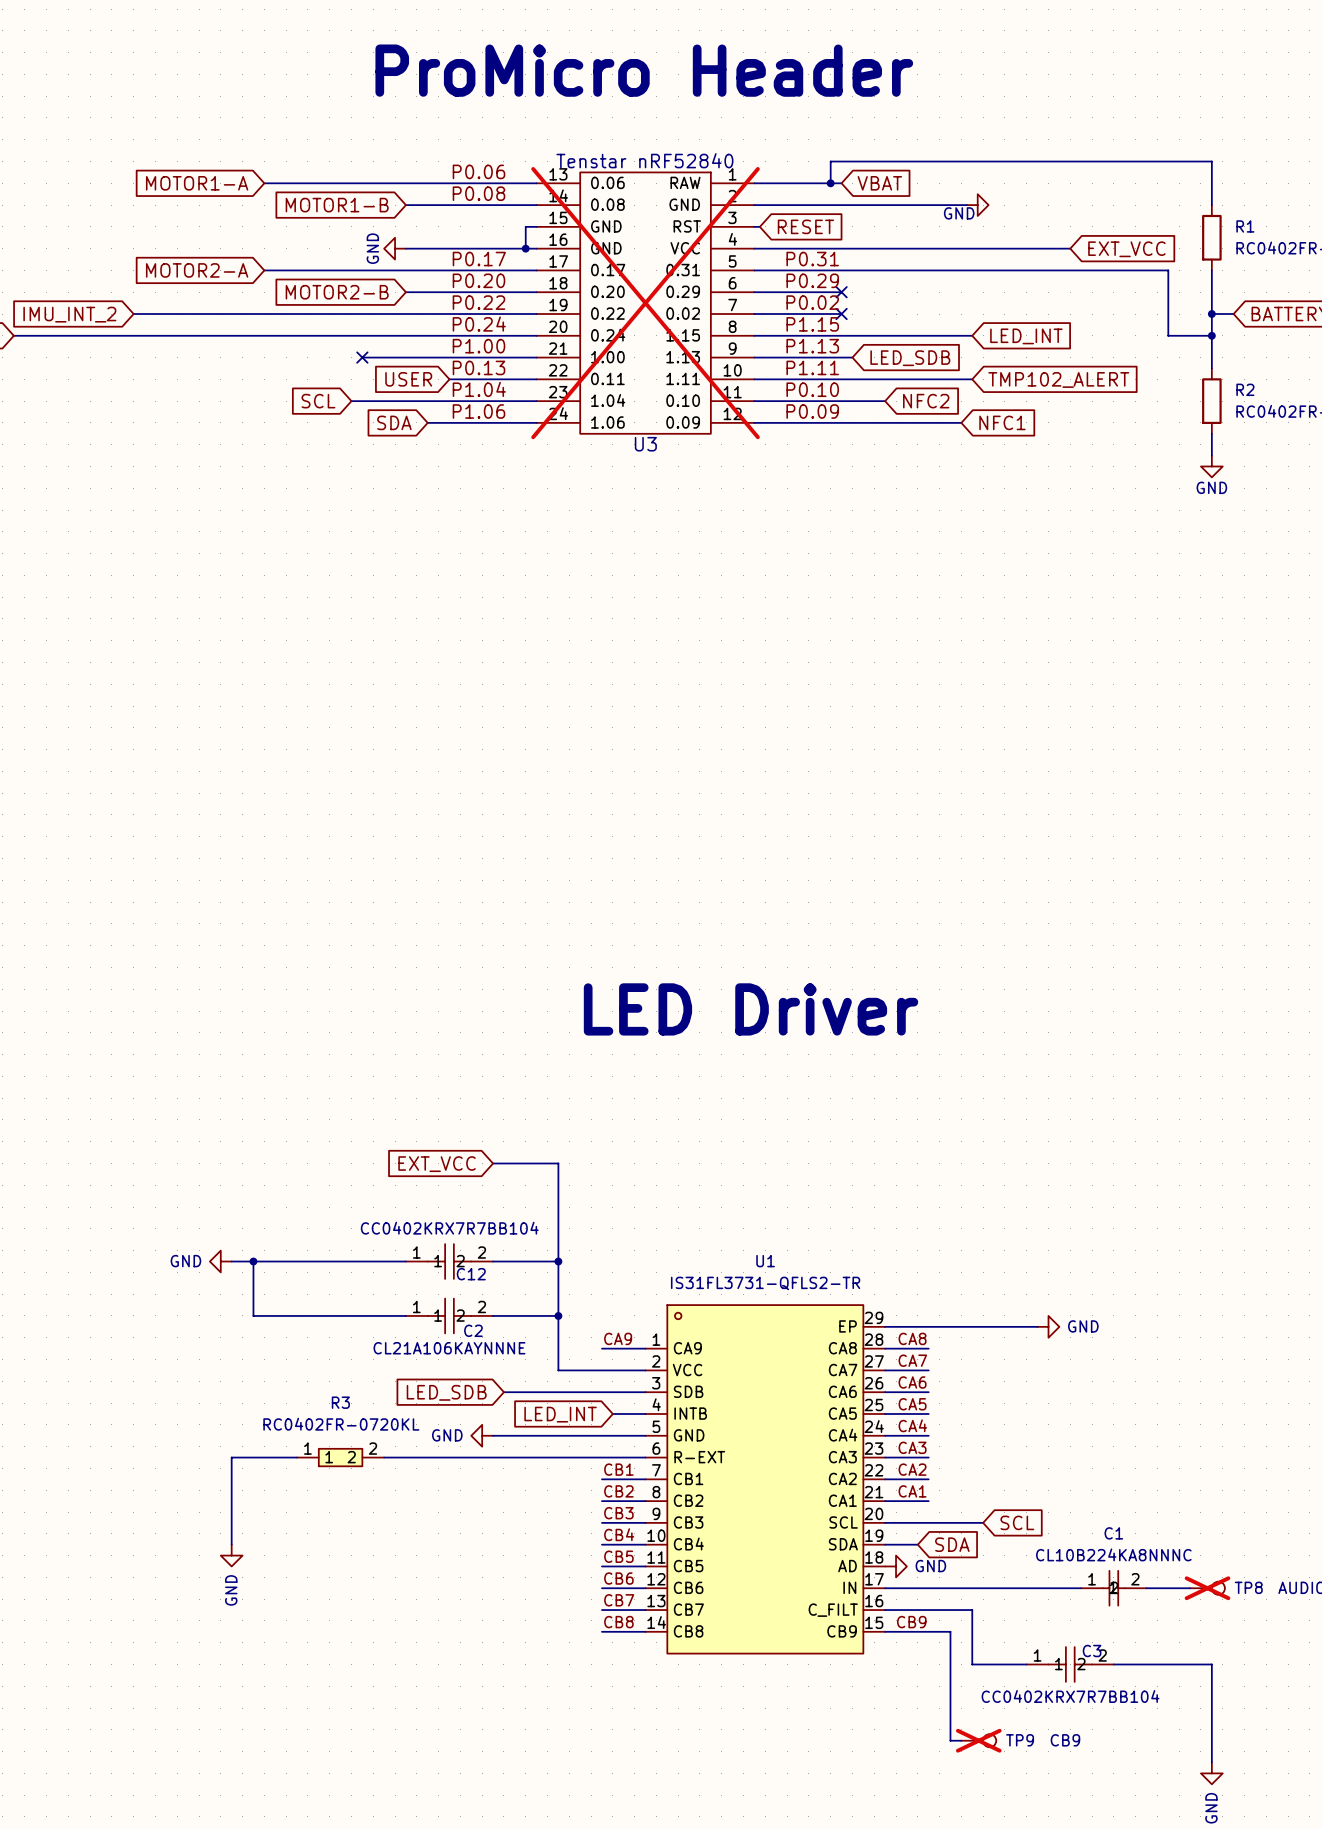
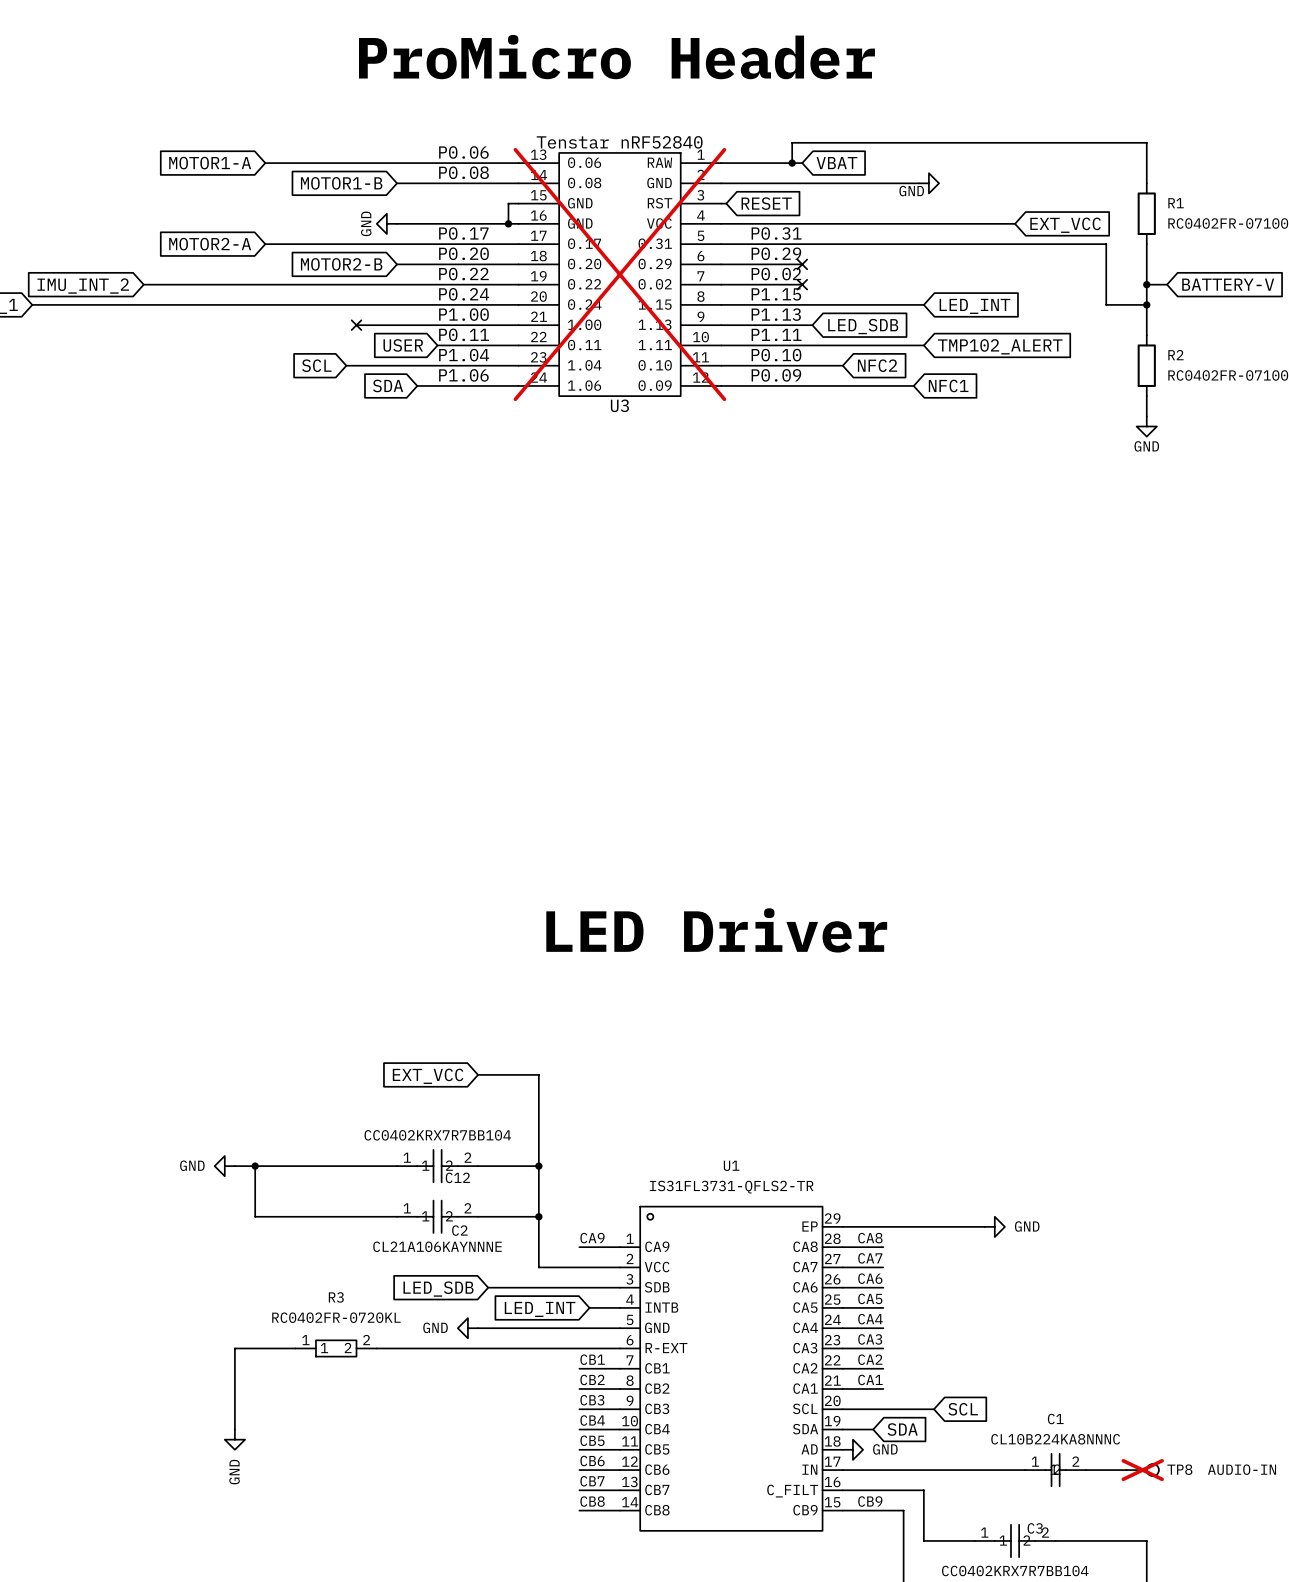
label: P0.13 (478, 367) -> P0.11 (464, 334)

